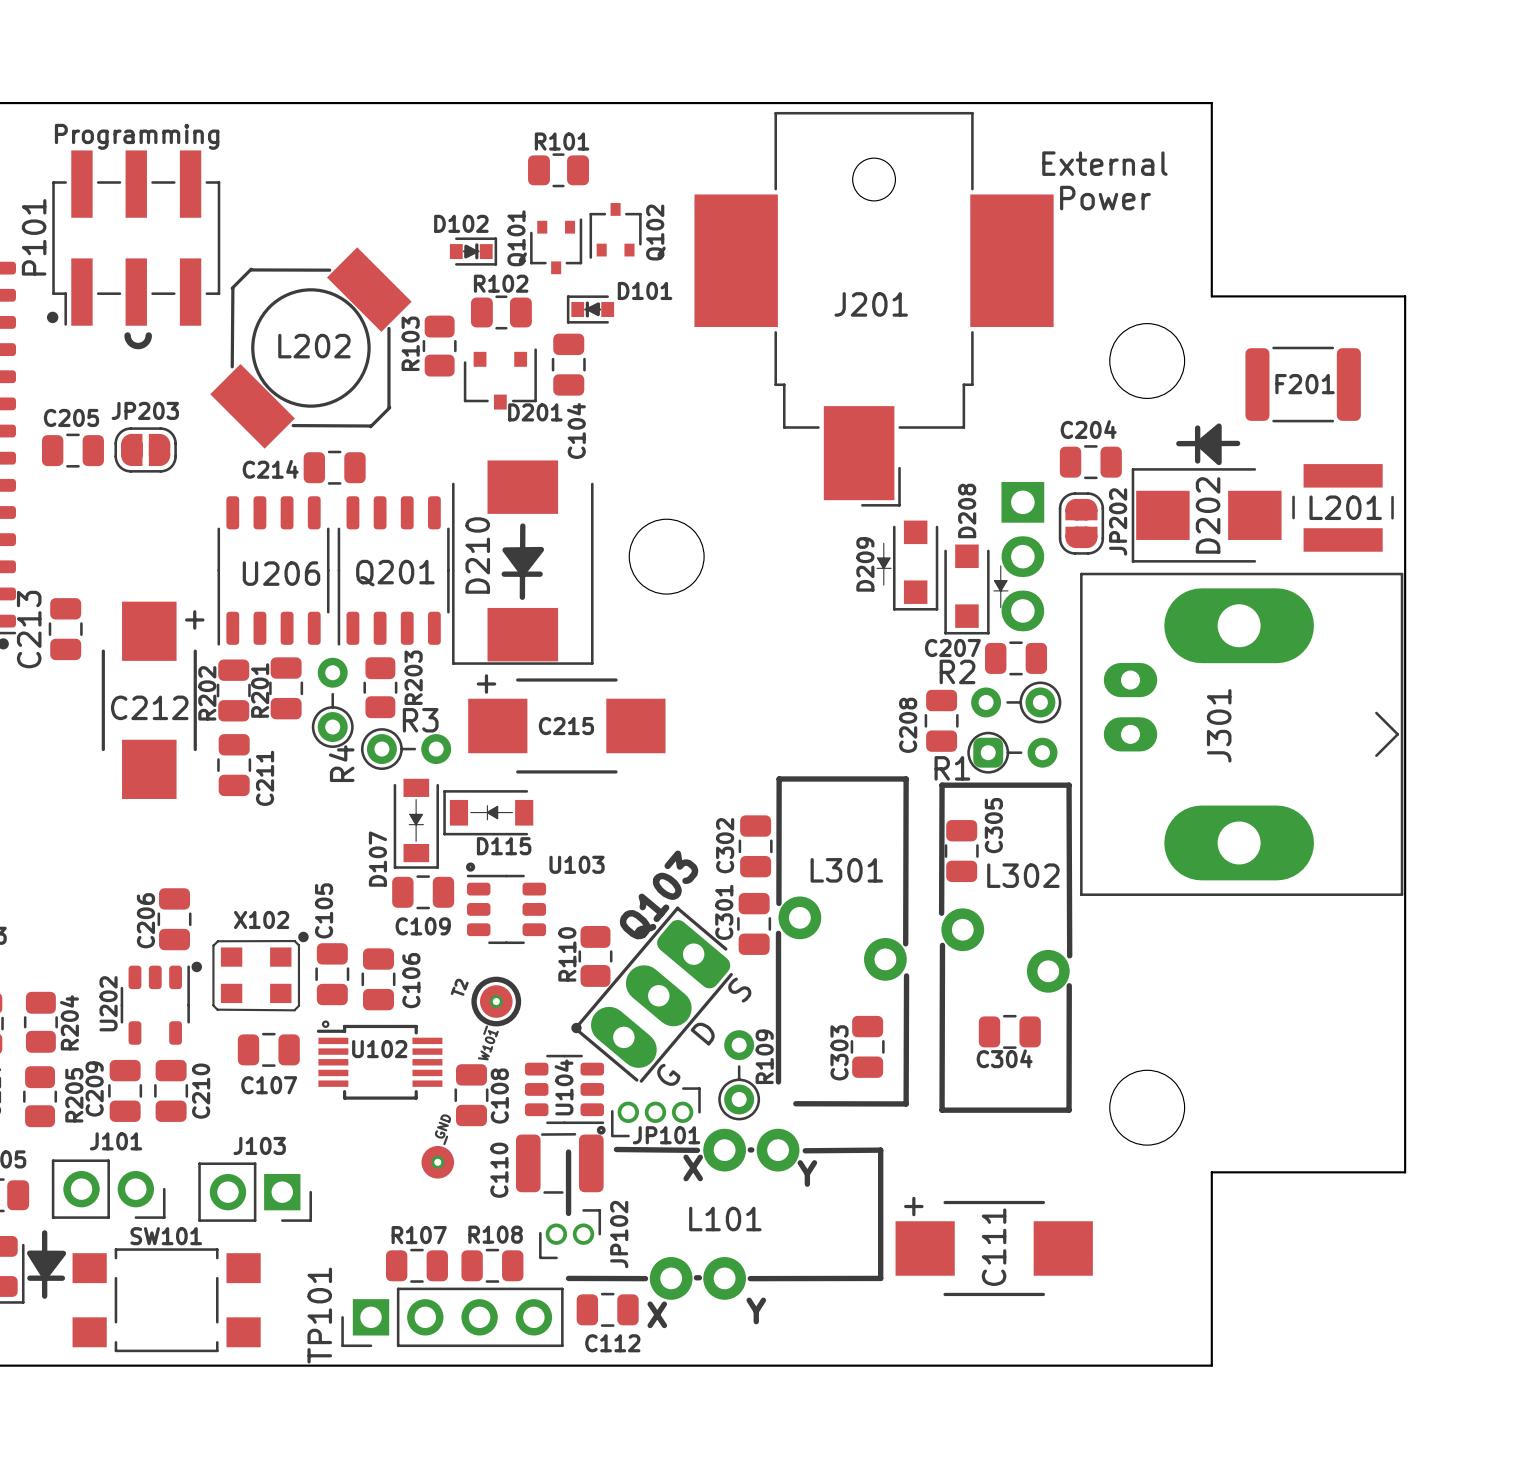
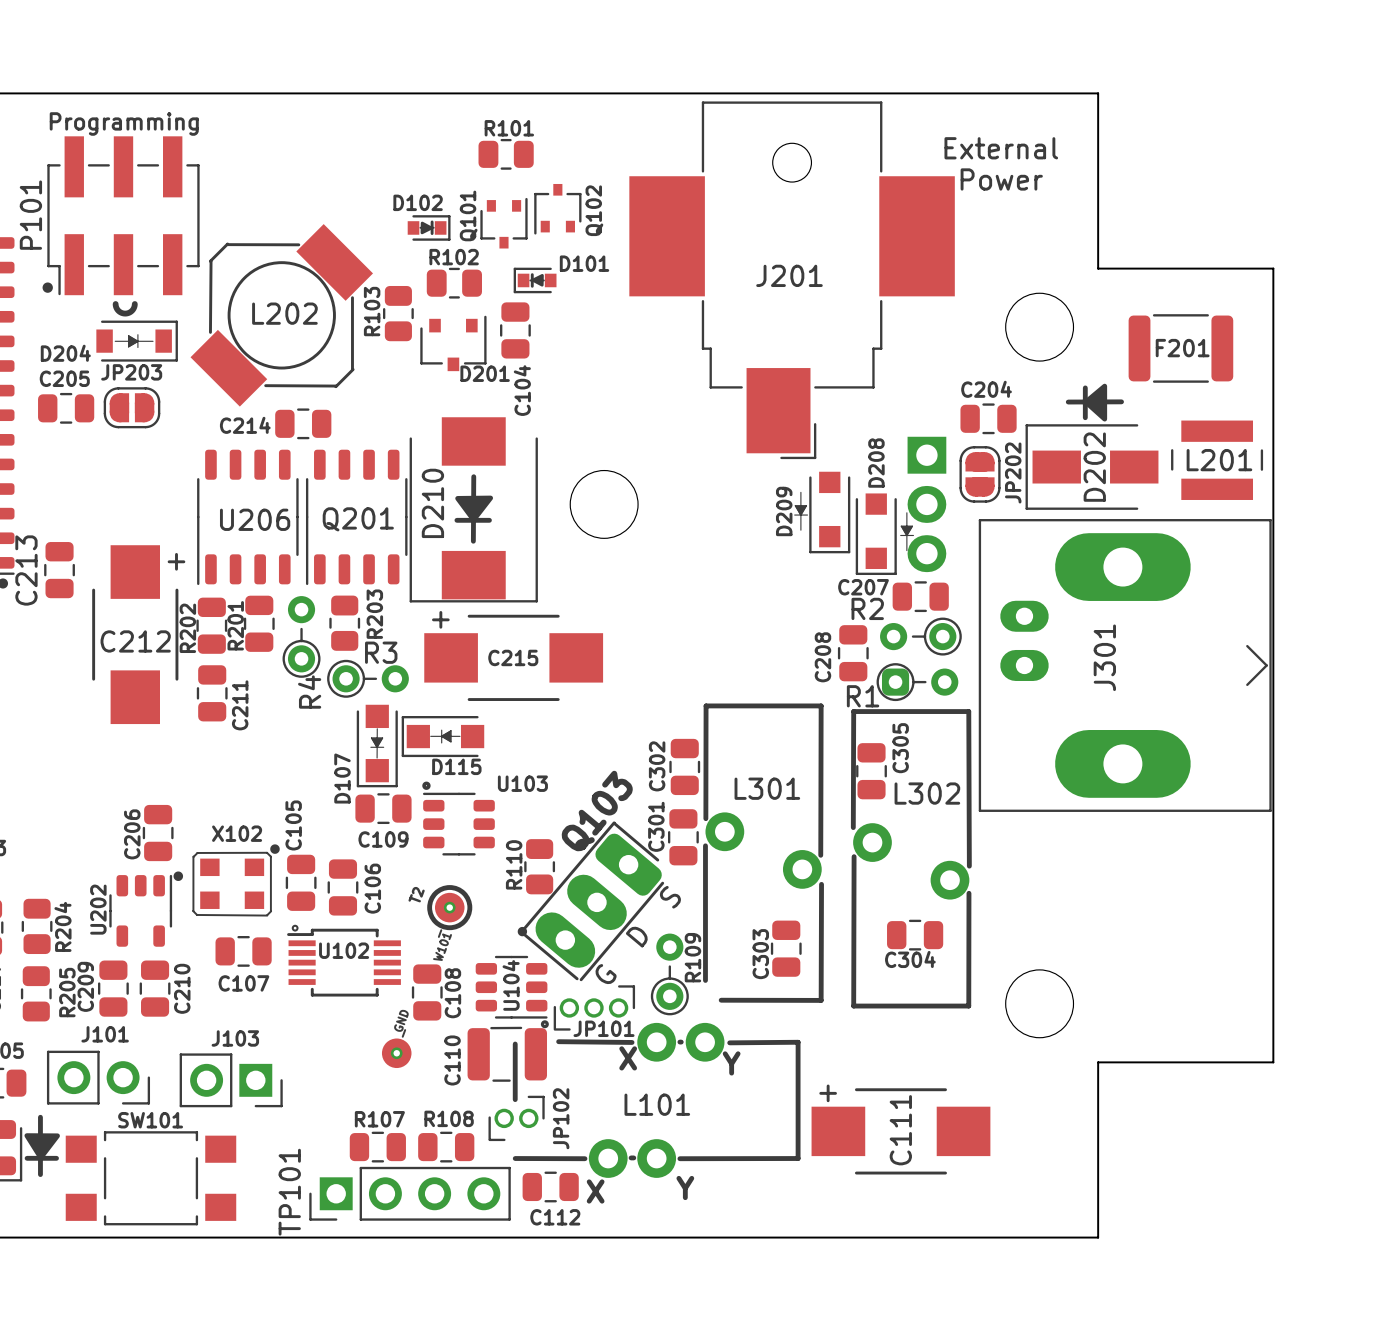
D204: none -> (137, 341)
D202 footprint: [1131, 423, 1282, 563] -> [1025, 383, 1159, 510]
D107 footprint: [393, 778, 439, 869] -> [356, 704, 398, 788]
D115 footprint: [443, 790, 534, 836] -> [401, 716, 485, 758]

